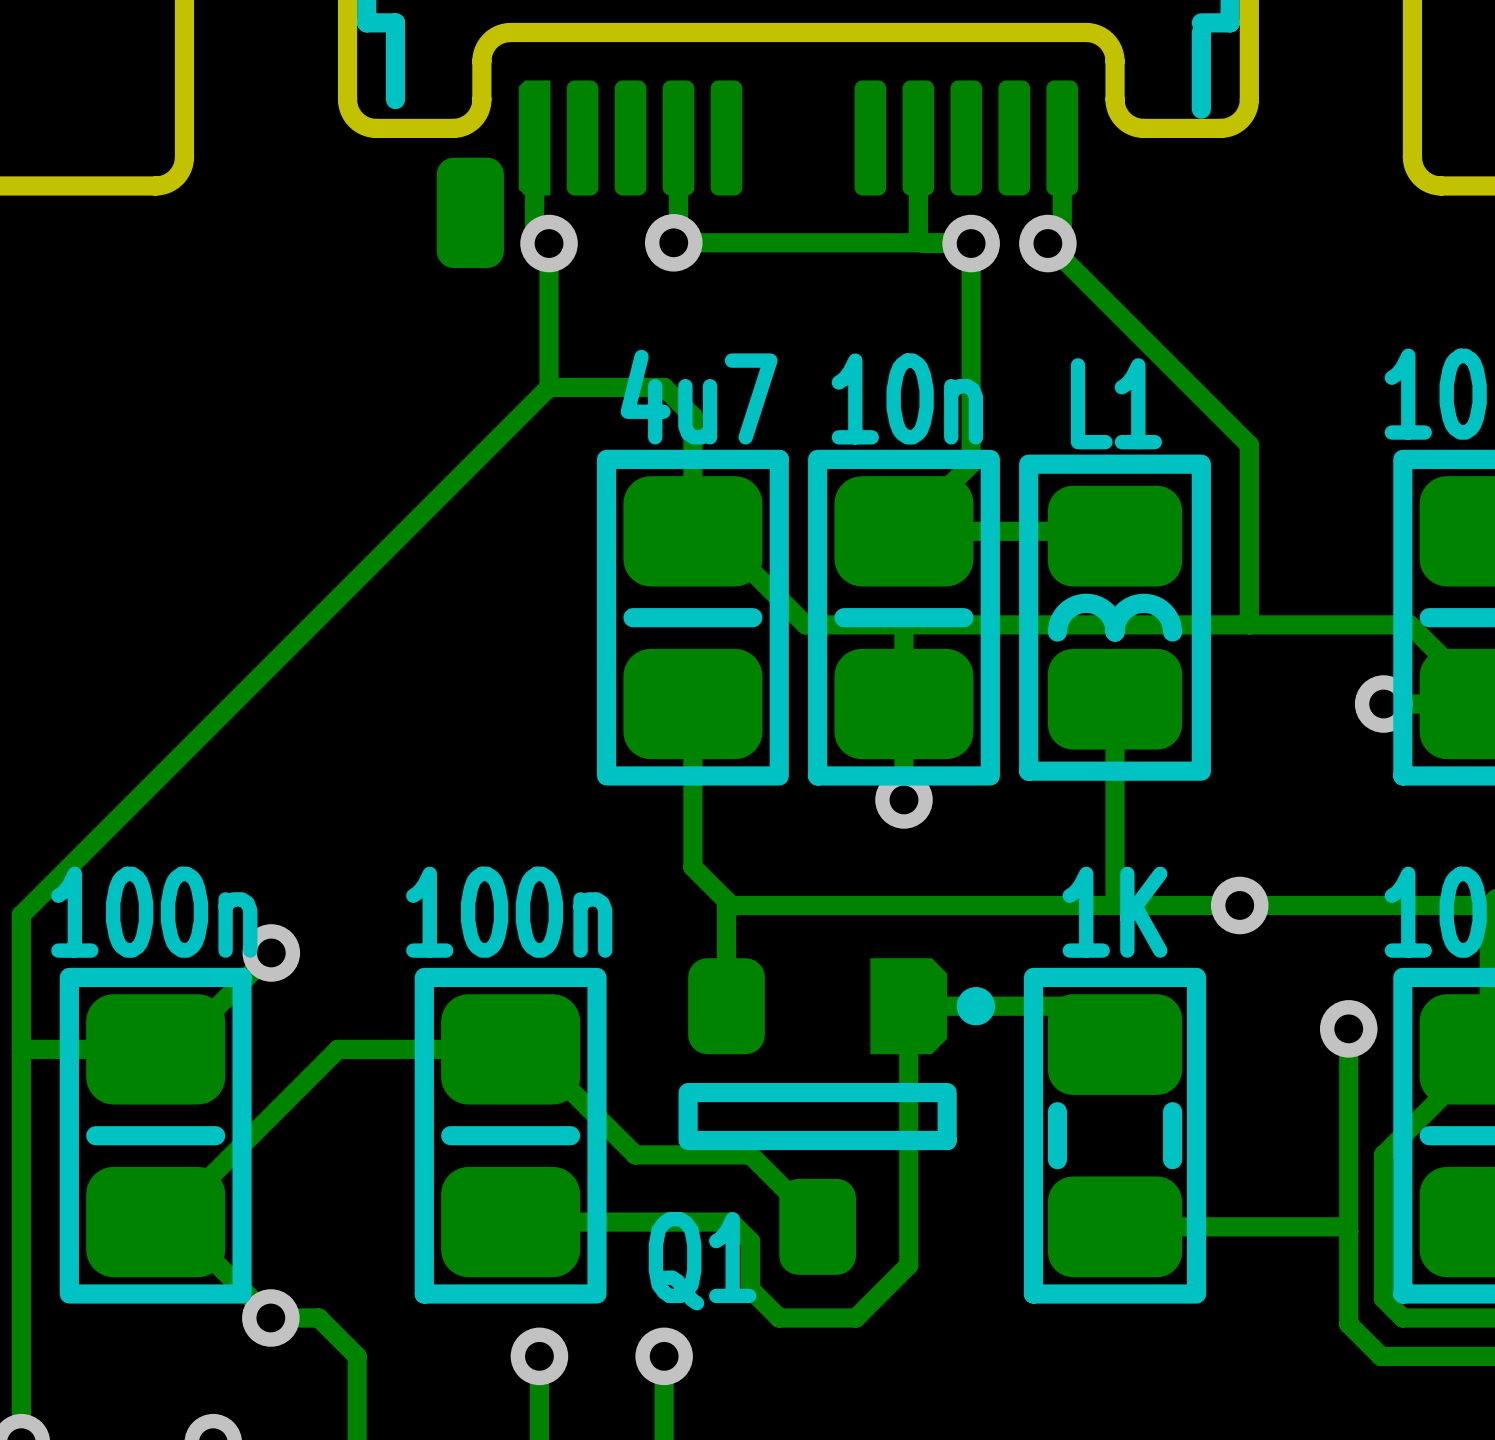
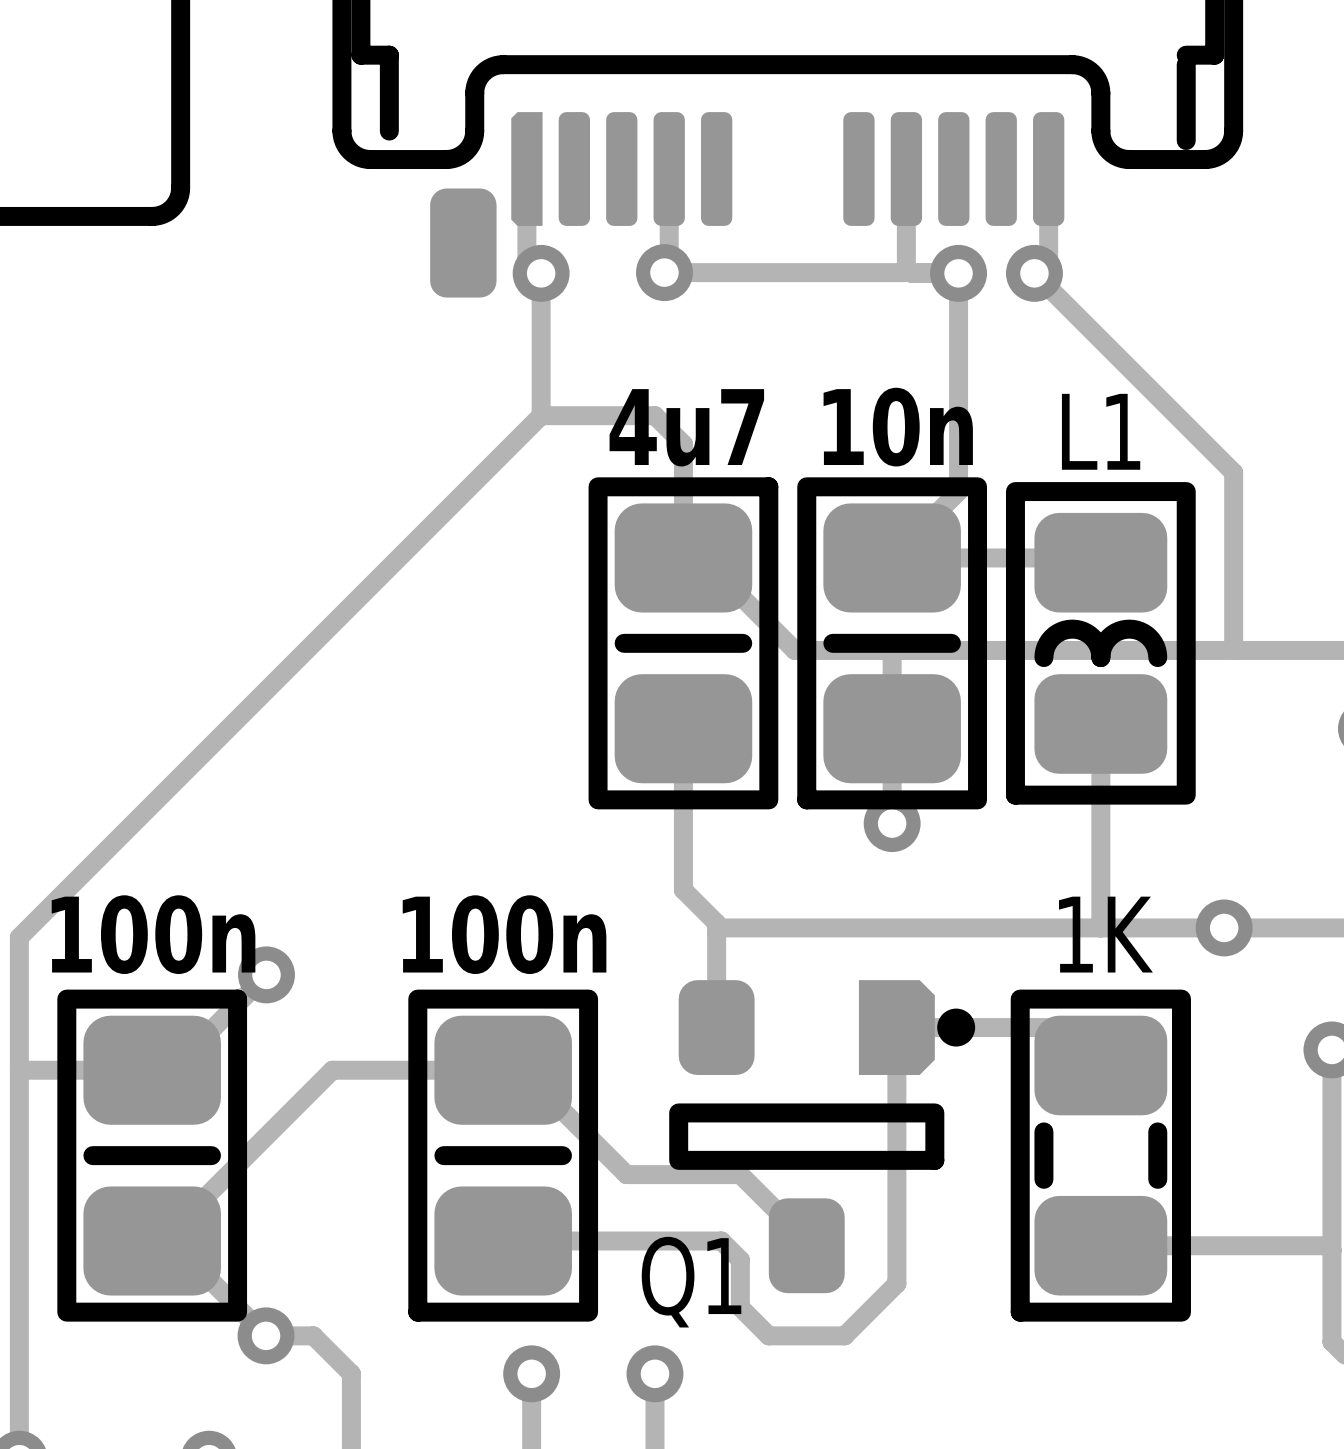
Q1 footprint: [678, 958, 996, 1275] -> [669, 980, 976, 1294]

